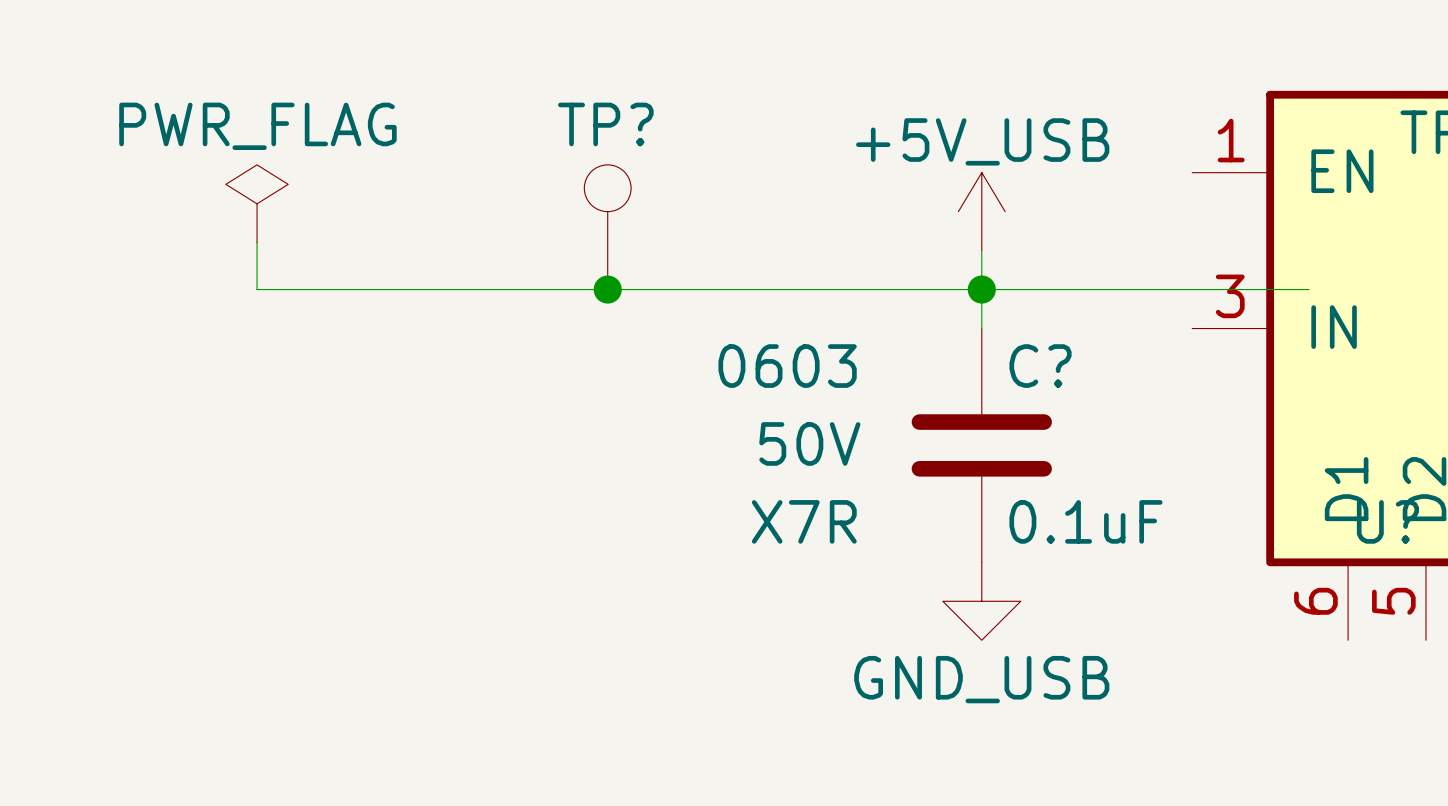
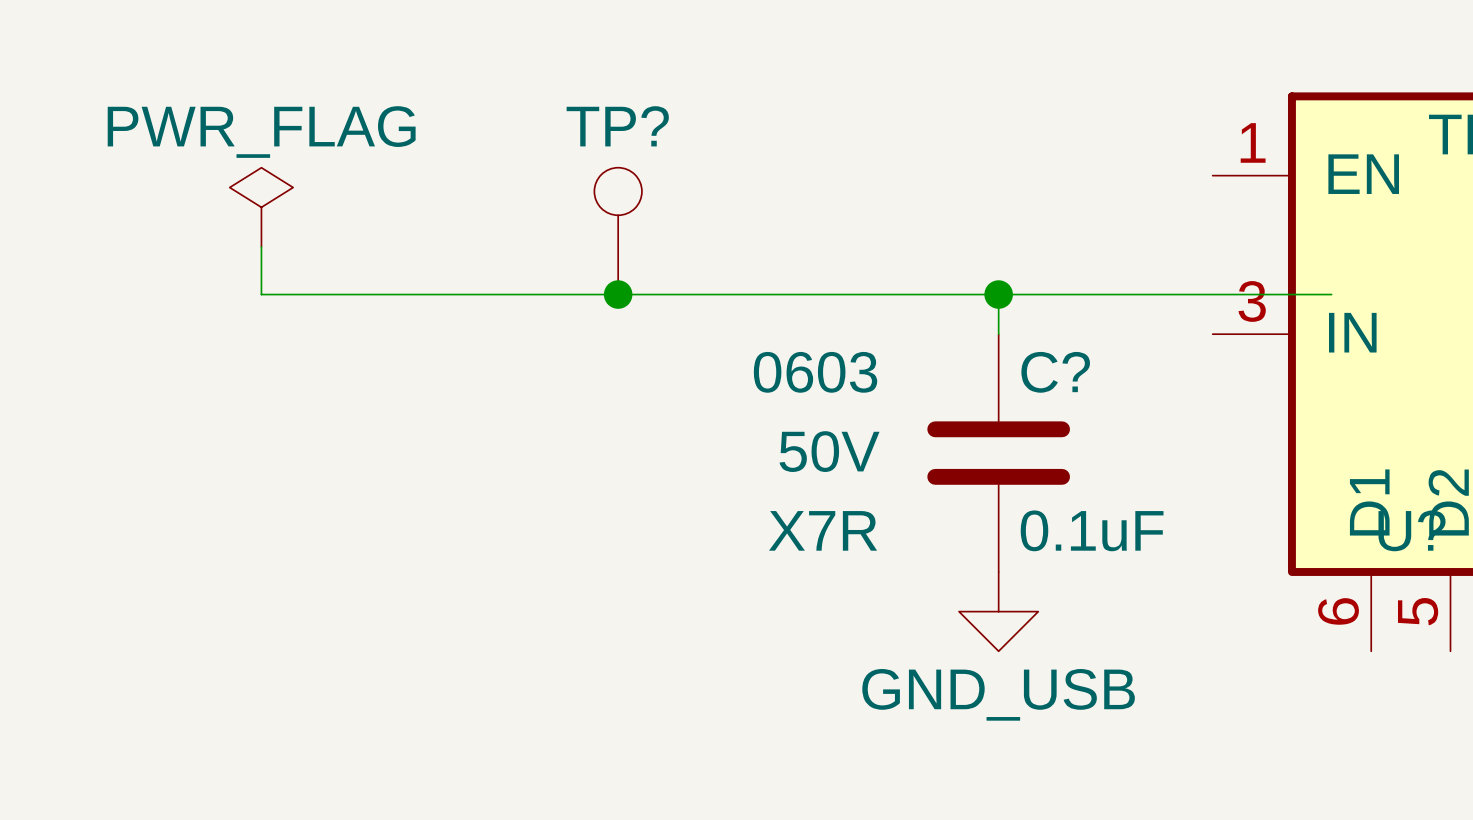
power symbol: +5V_USB (981, 211) -> none
wire: (981, 250) (981, 289) -> none

